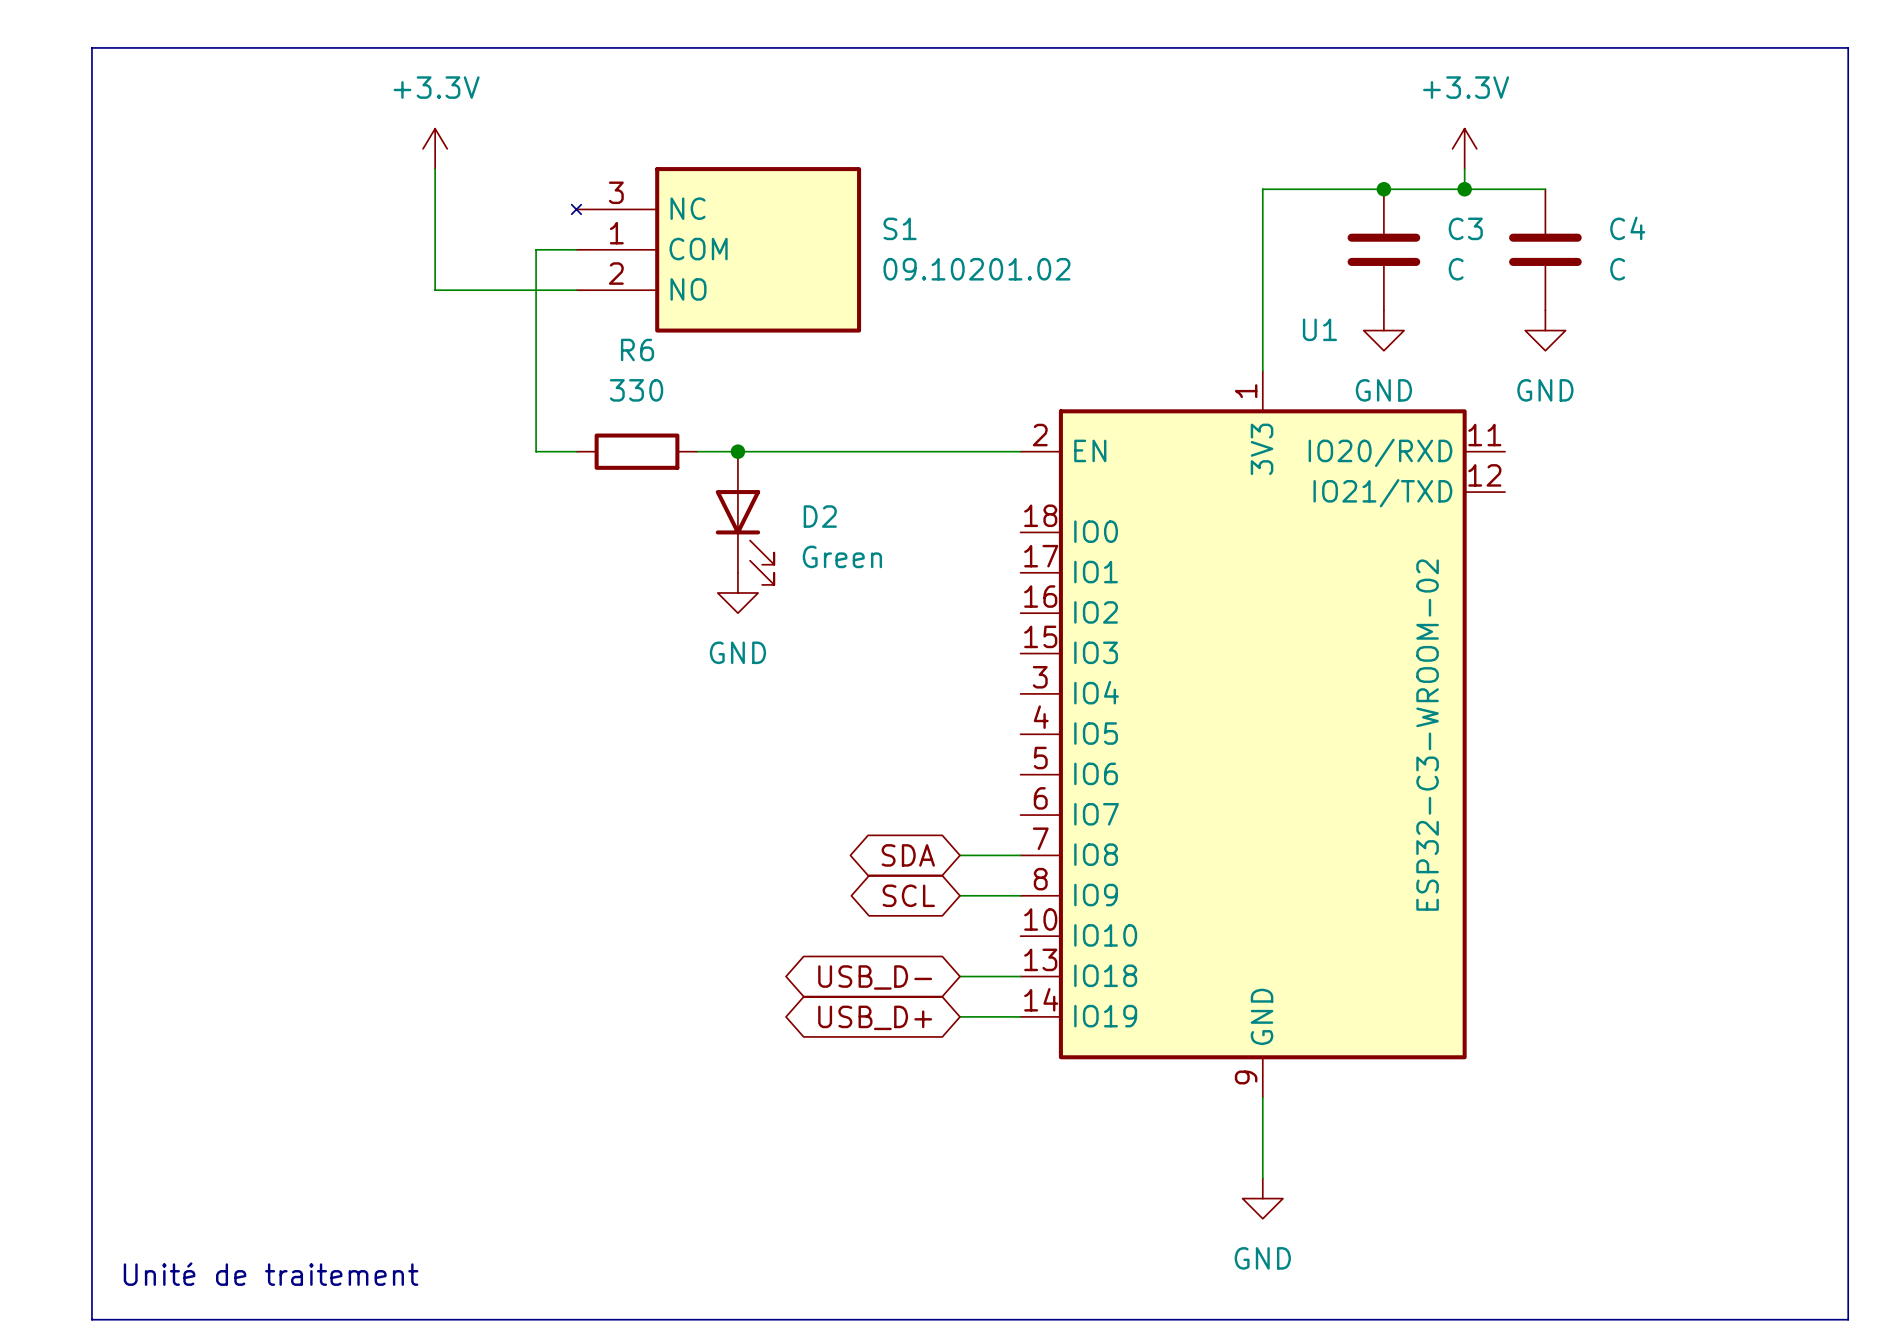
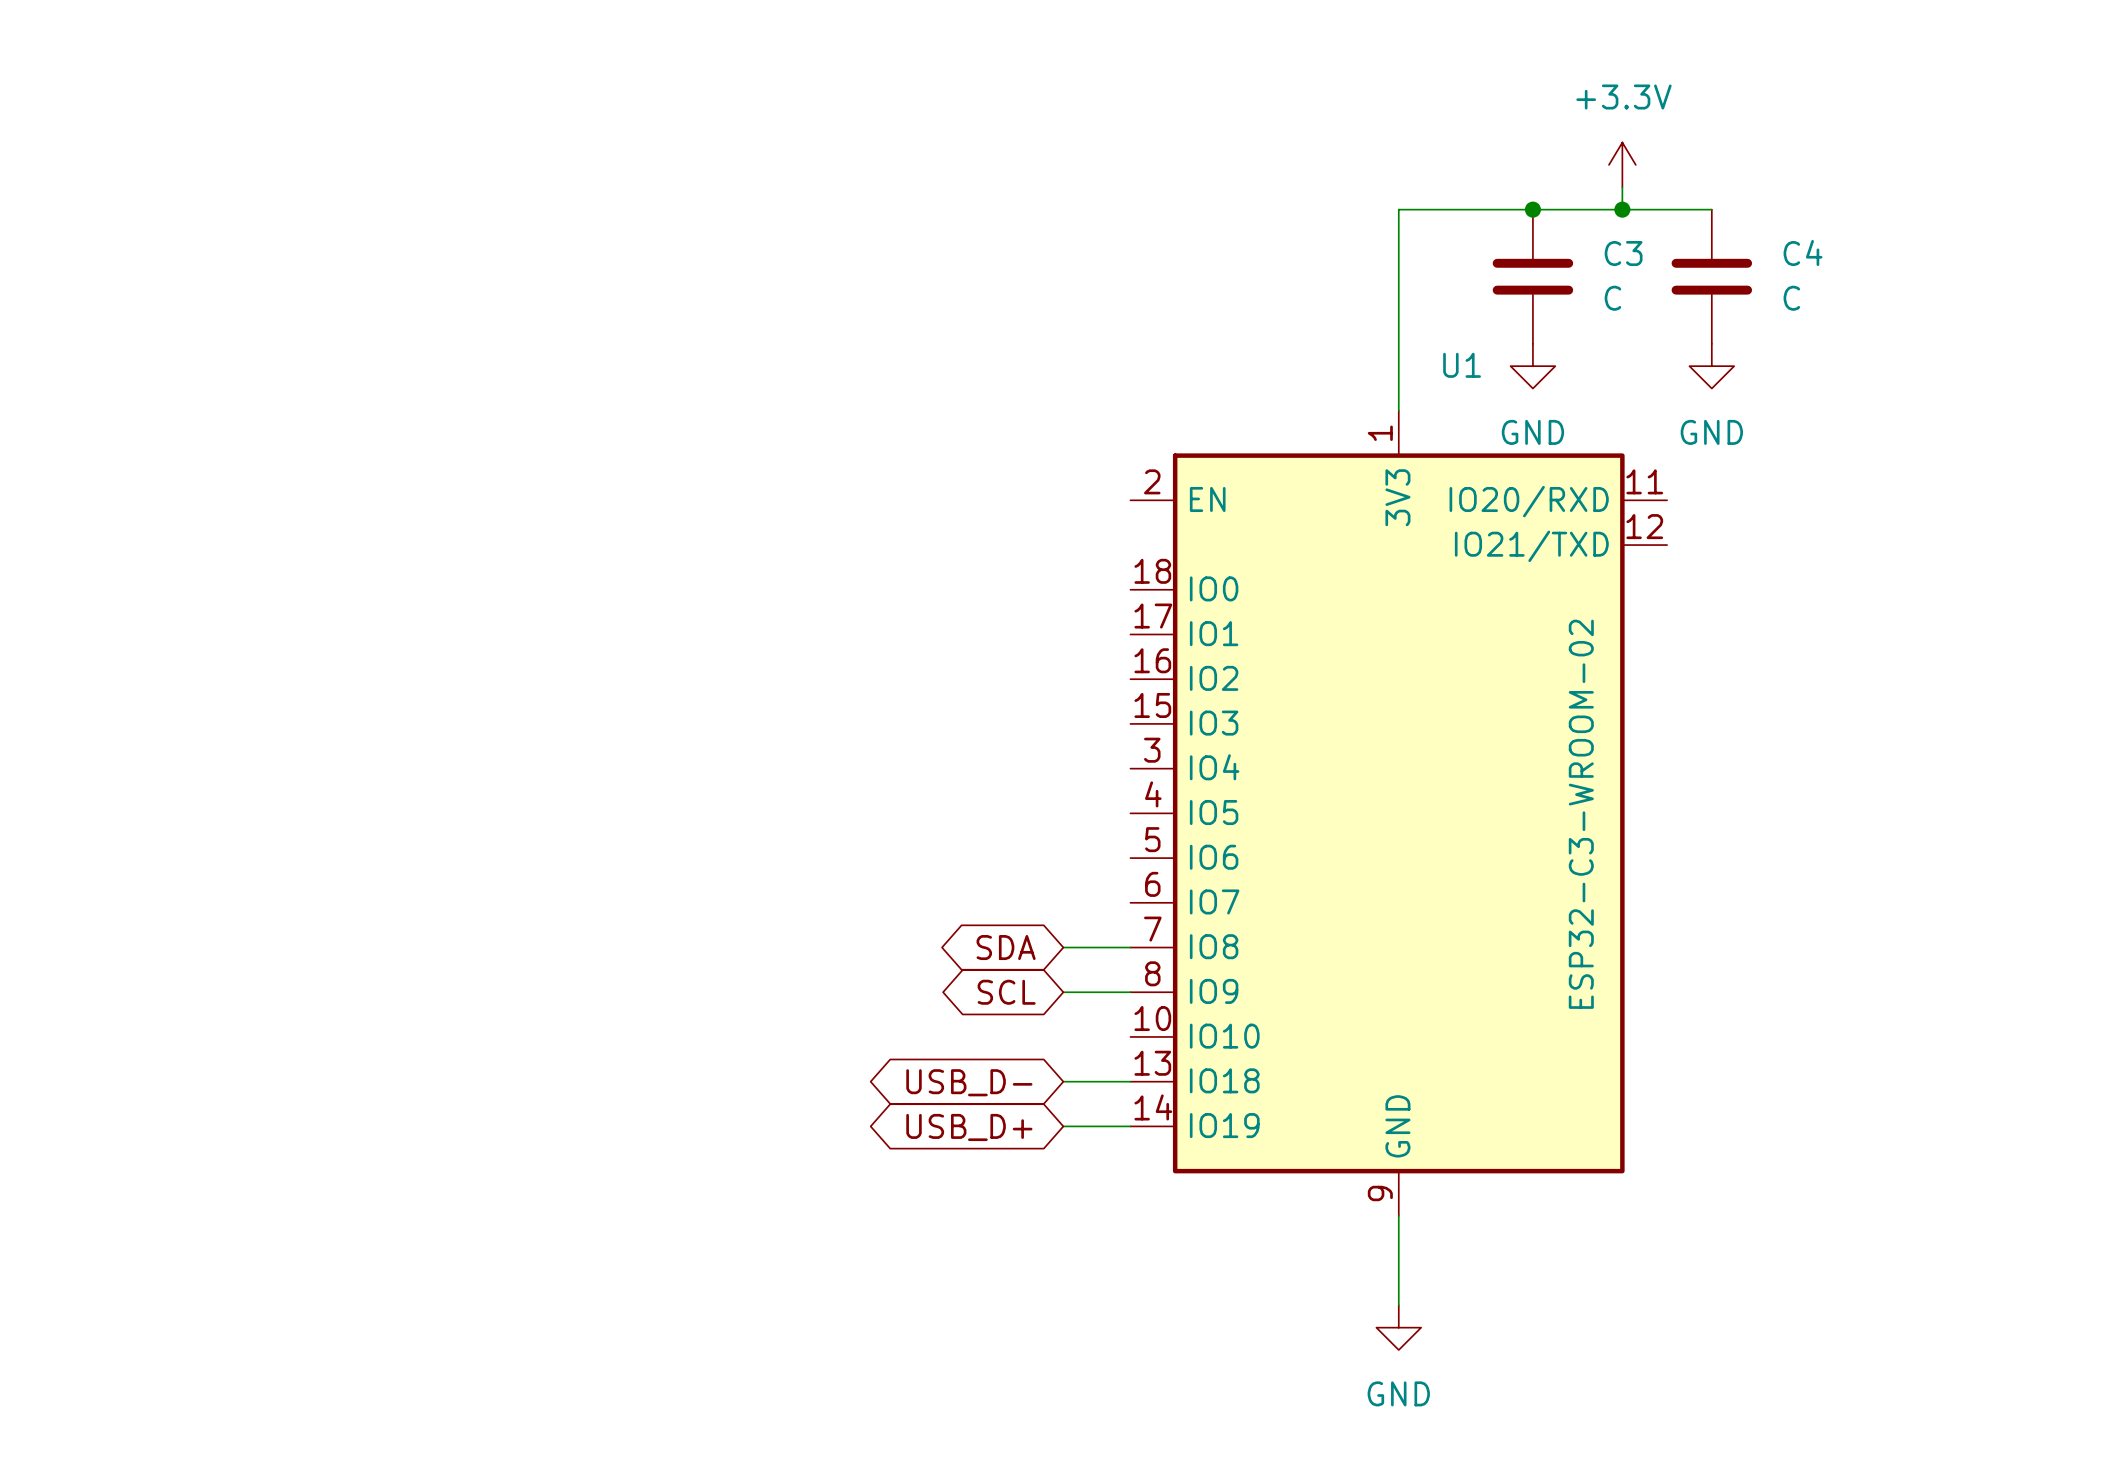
line: (91, 47) (1848, 47) (1848, 1319) (91, 1319) (91, 47) -> none
power symbol: +3.3V (435, 148) -> none
wire: (435, 169) (435, 290) (576, 290) -> none
wire: (576, 249) (536, 249) (536, 451) (576, 451) -> none
S1: 09.10201.02 (716, 249) -> none
R6: 330 (637, 451) -> none
wire: (697, 451) (1020, 451) -> none
junction: (737, 451) -> none
D2: Green (745, 518) -> none
power symbol: GND (737, 592) -> none
text: Unité de traitement (271, 1274) -> none

